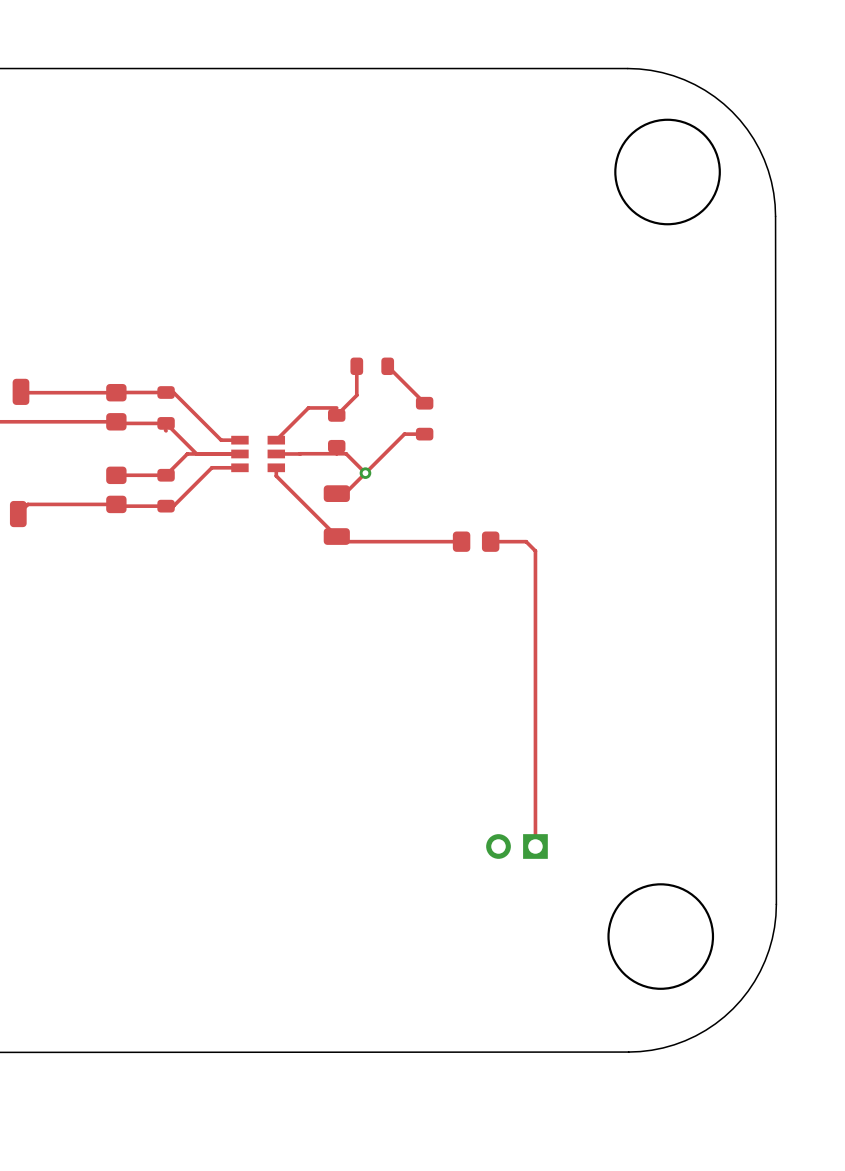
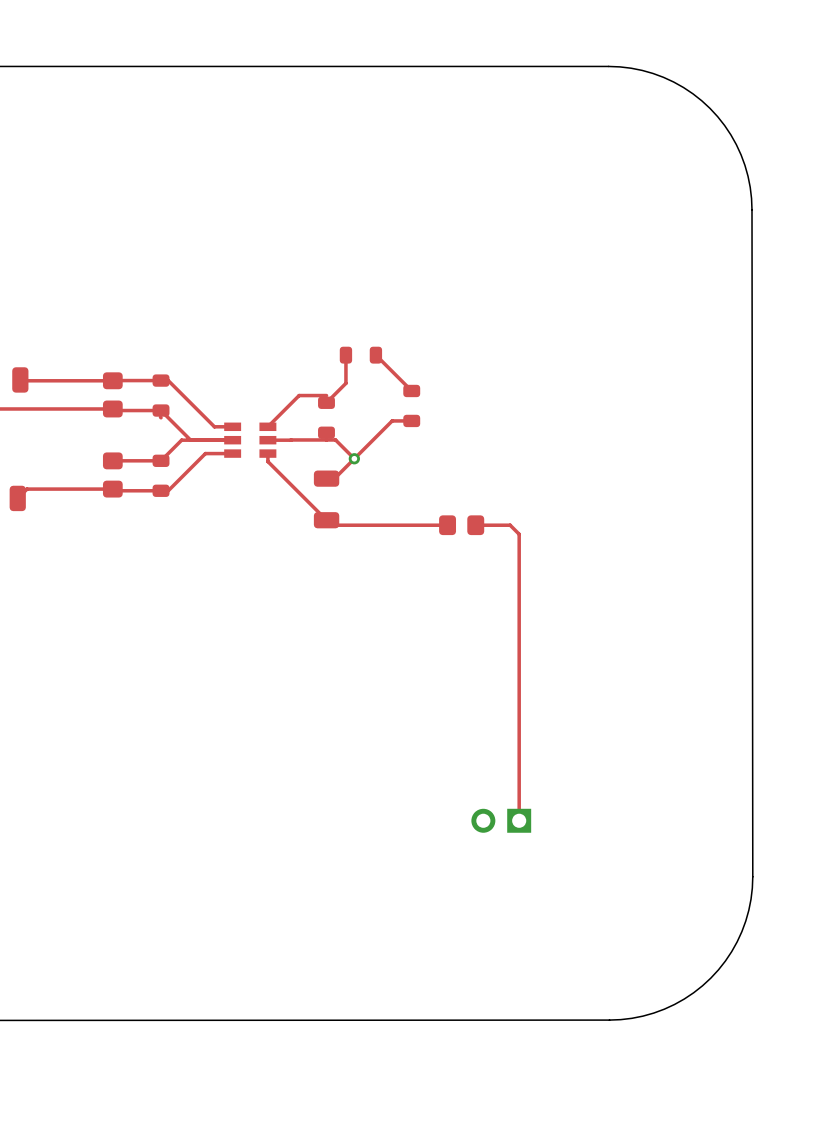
round board edge: [614, 118, 721, 226] -> none
round board edge: [607, 883, 715, 990] -> none

